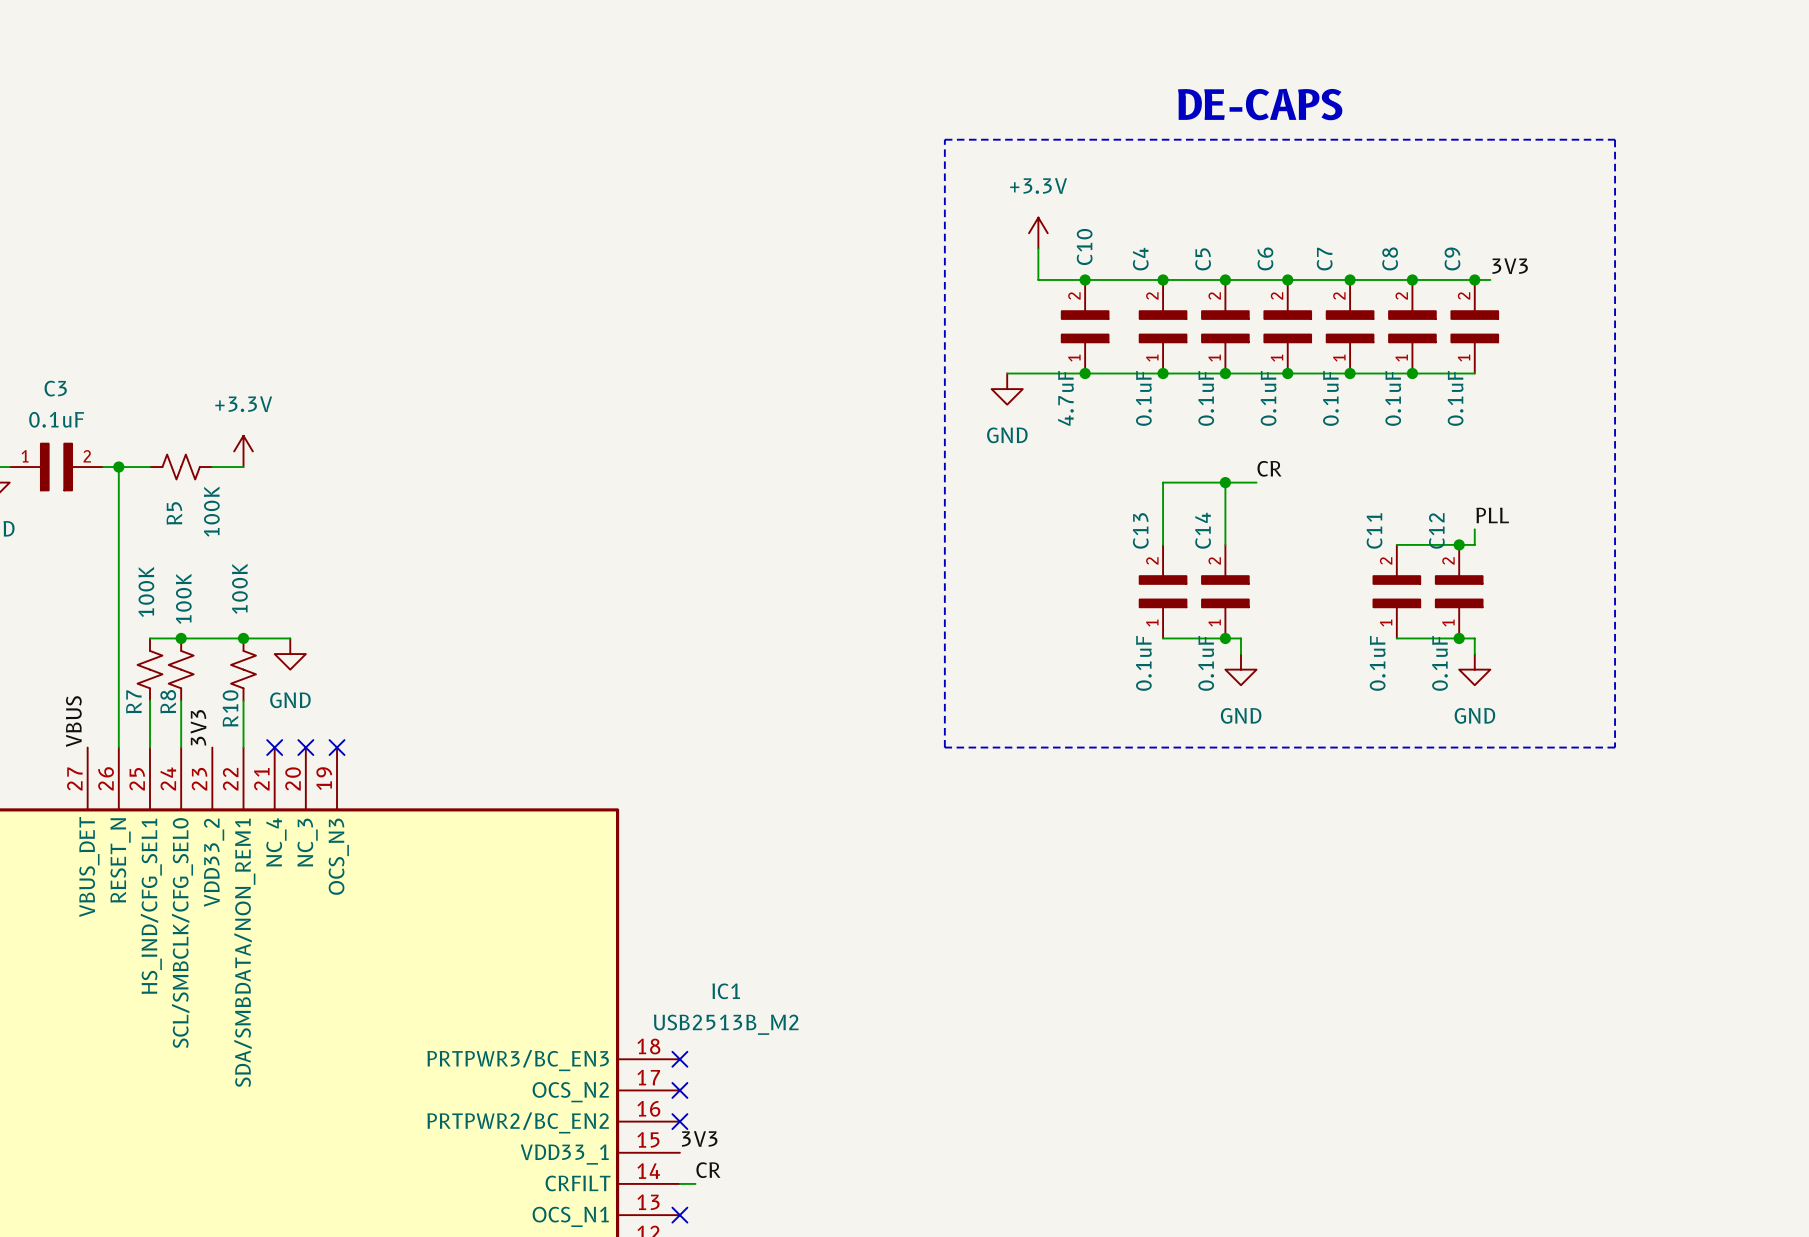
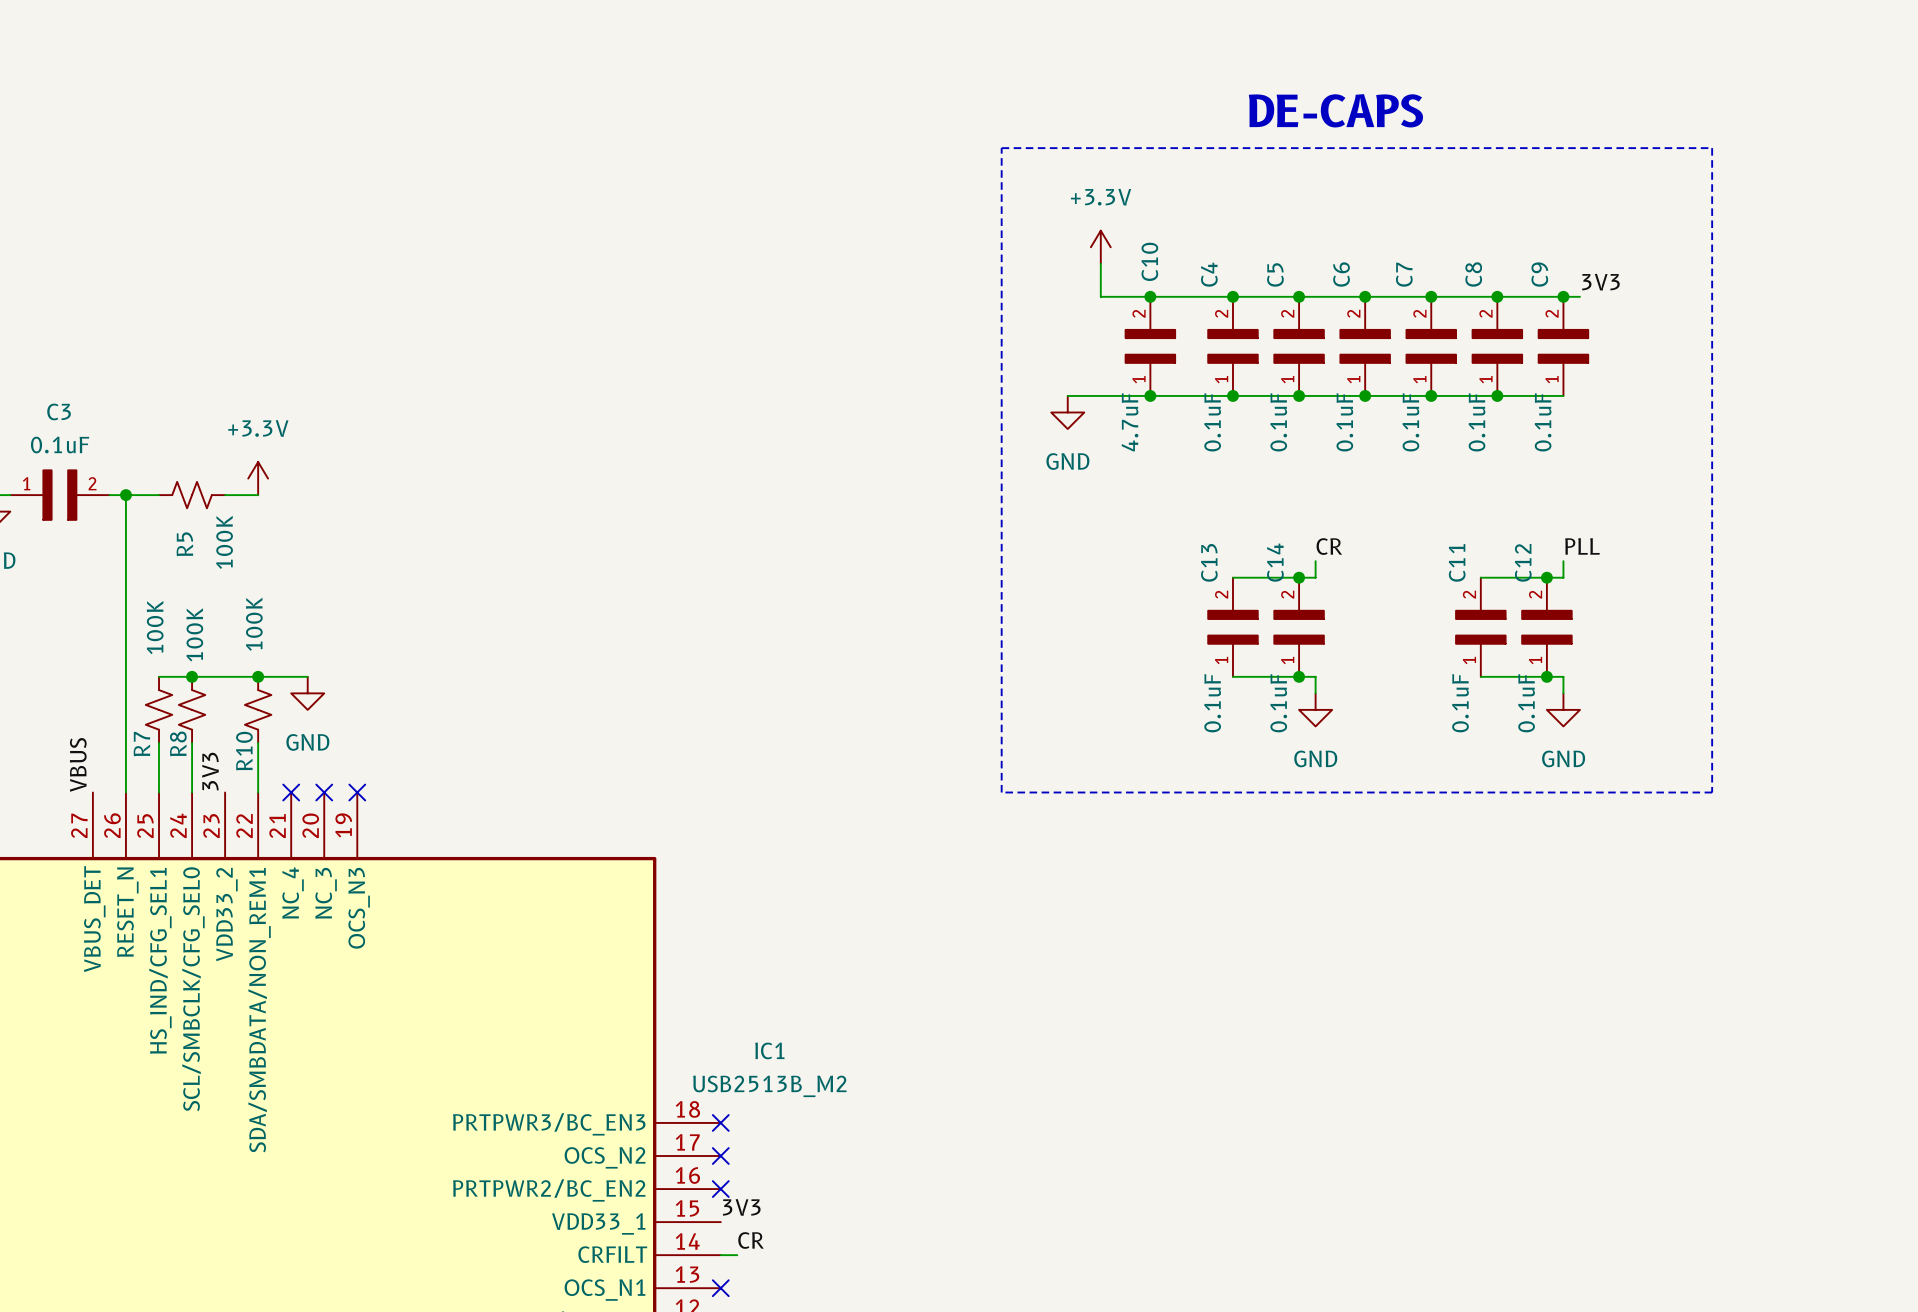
label position: CR (1269, 468) -> CR (1329, 546)
wire: (1225, 482) (1225, 544) -> none
junction position: (1225, 482) -> (1299, 577)
wire: (1256, 482) (1163, 482) (1163, 544) -> (1315, 561) (1315, 577) (1232, 577)

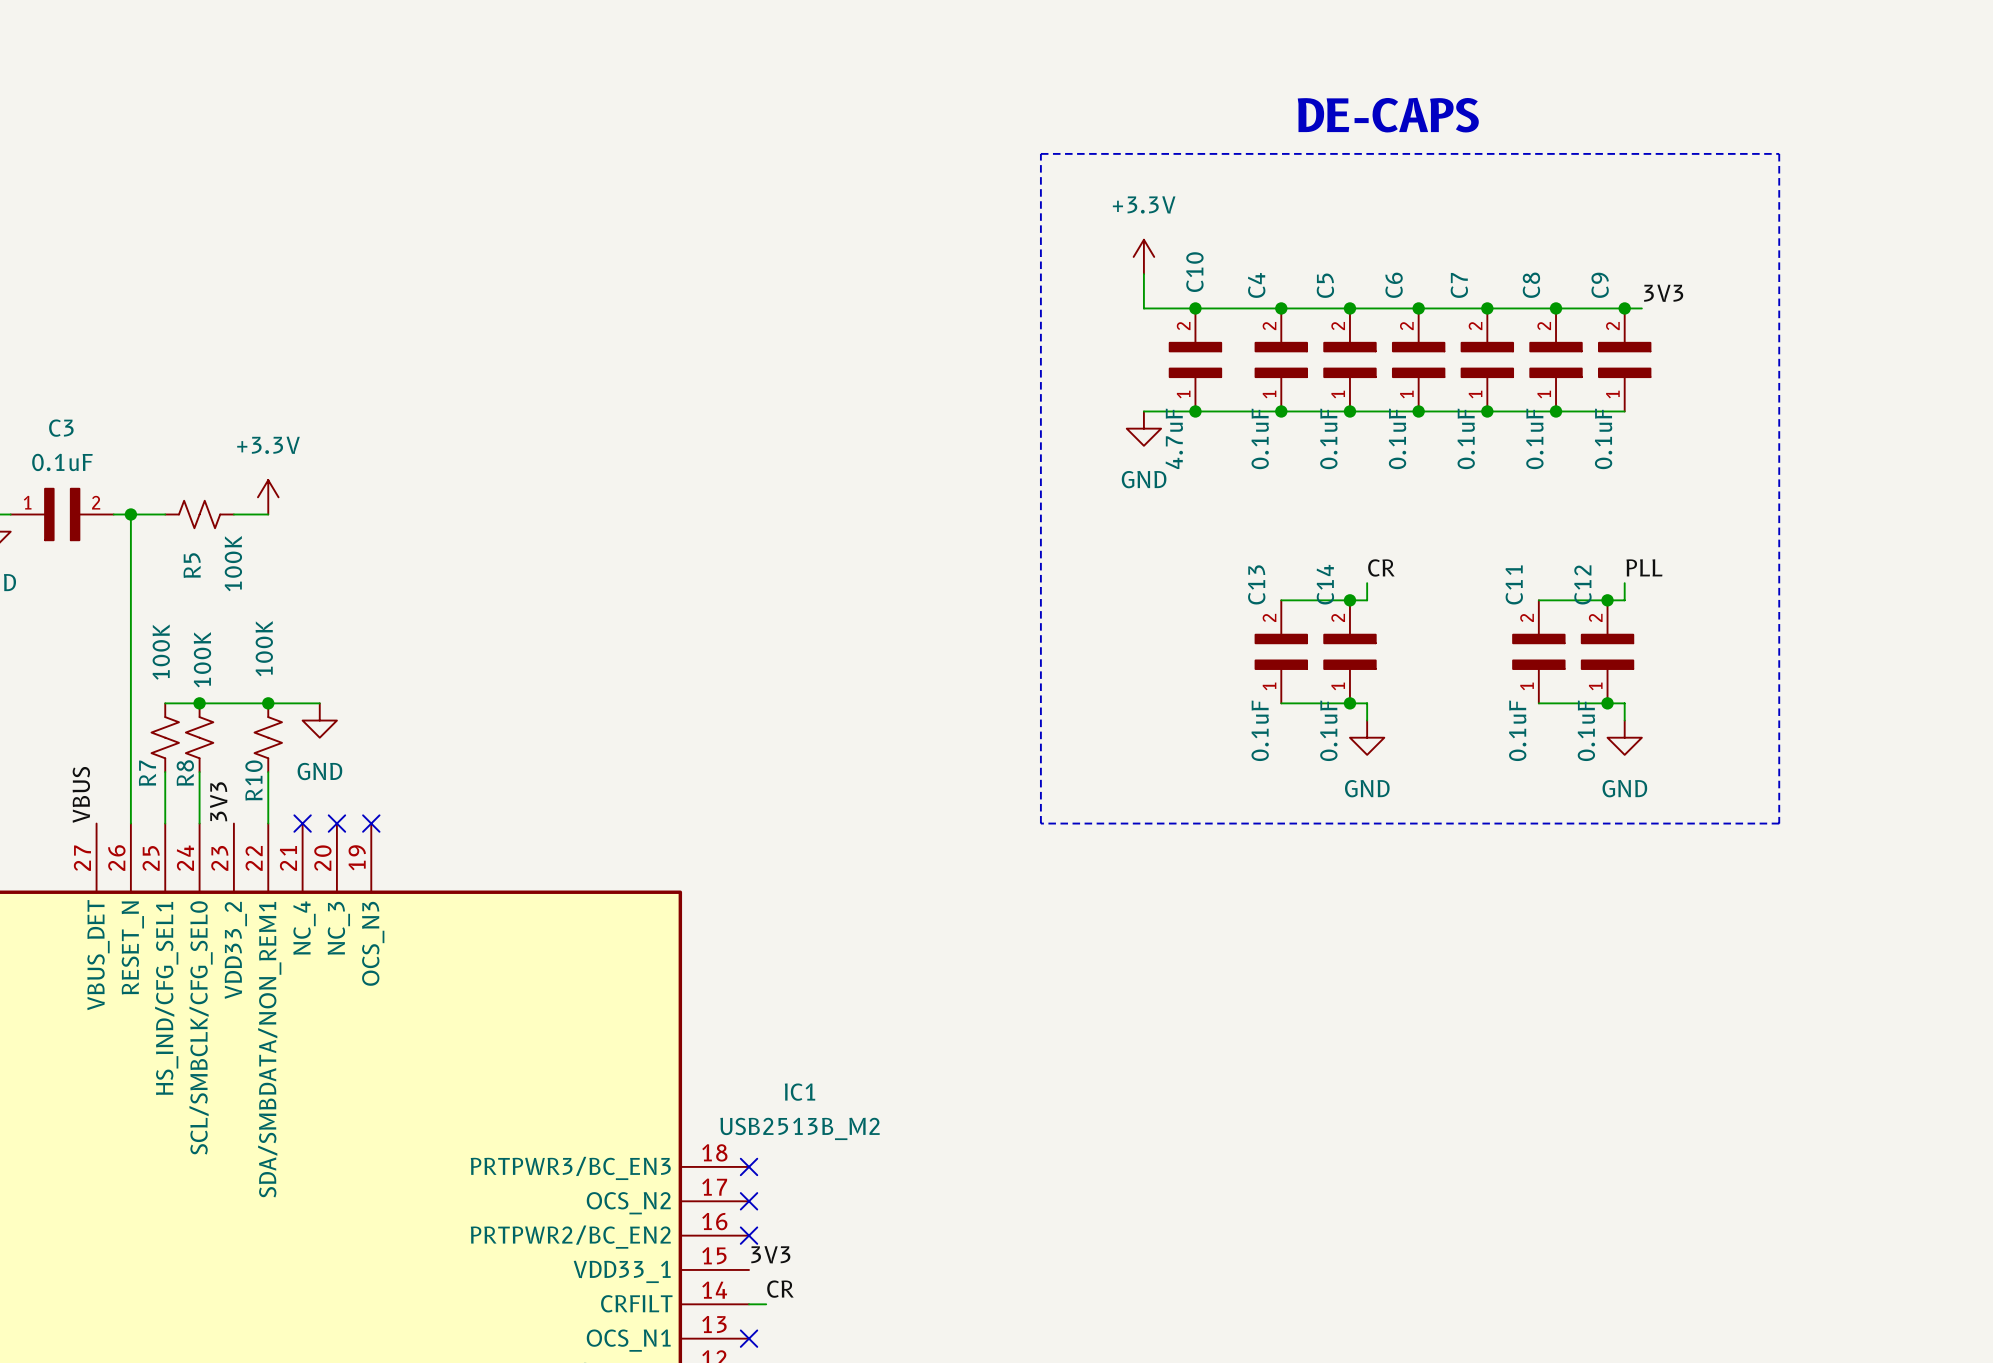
wire: (1067, 395) (1100, 395) -> none
power symbol position: GND (1067, 412) -> GND (1143, 428)

